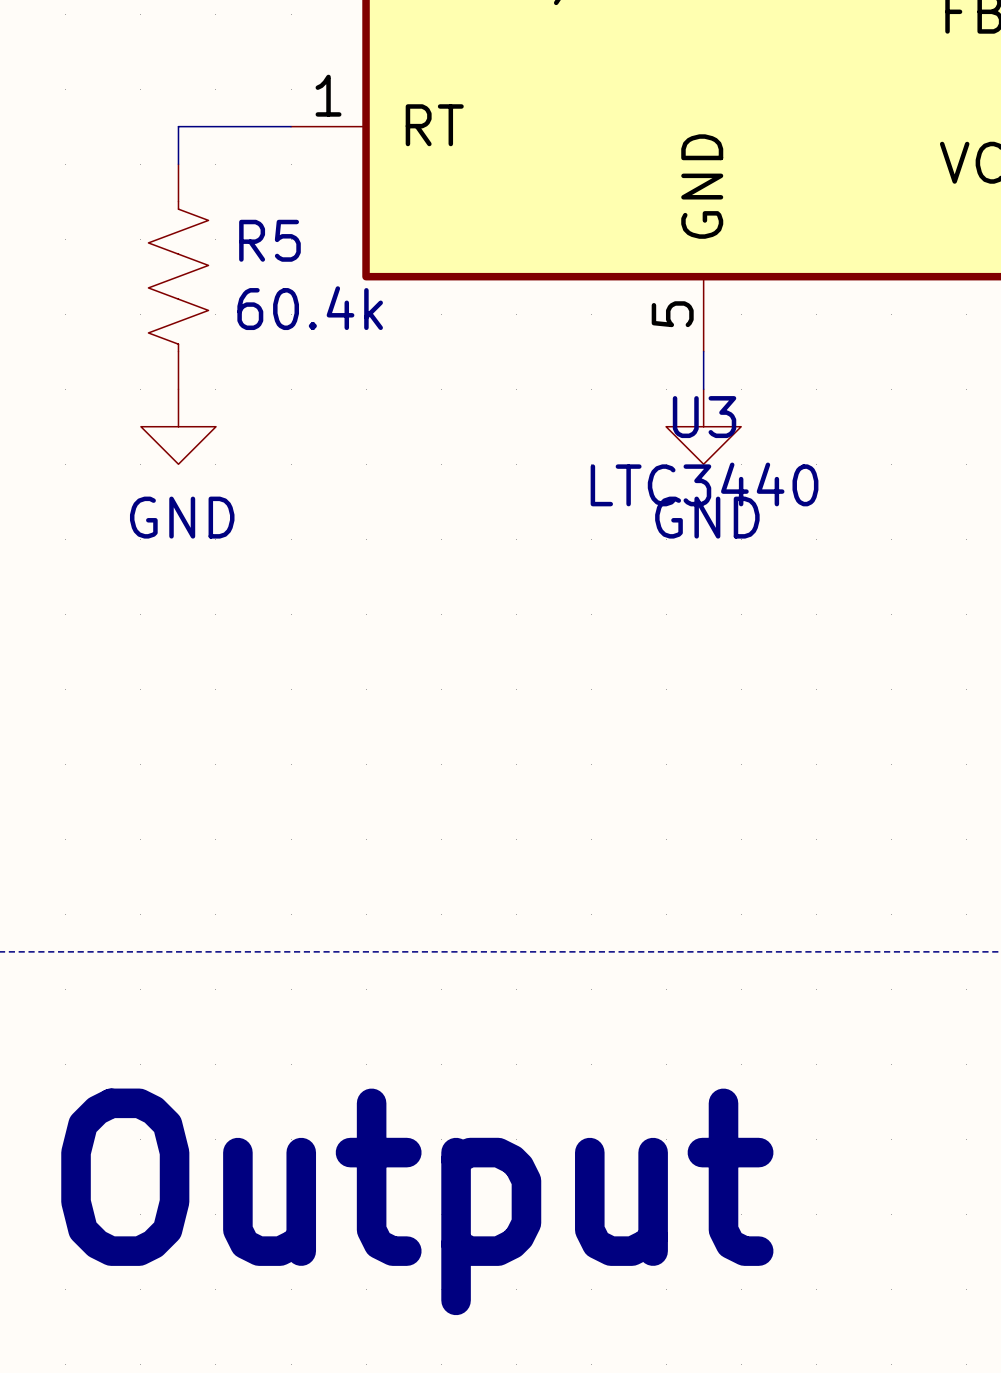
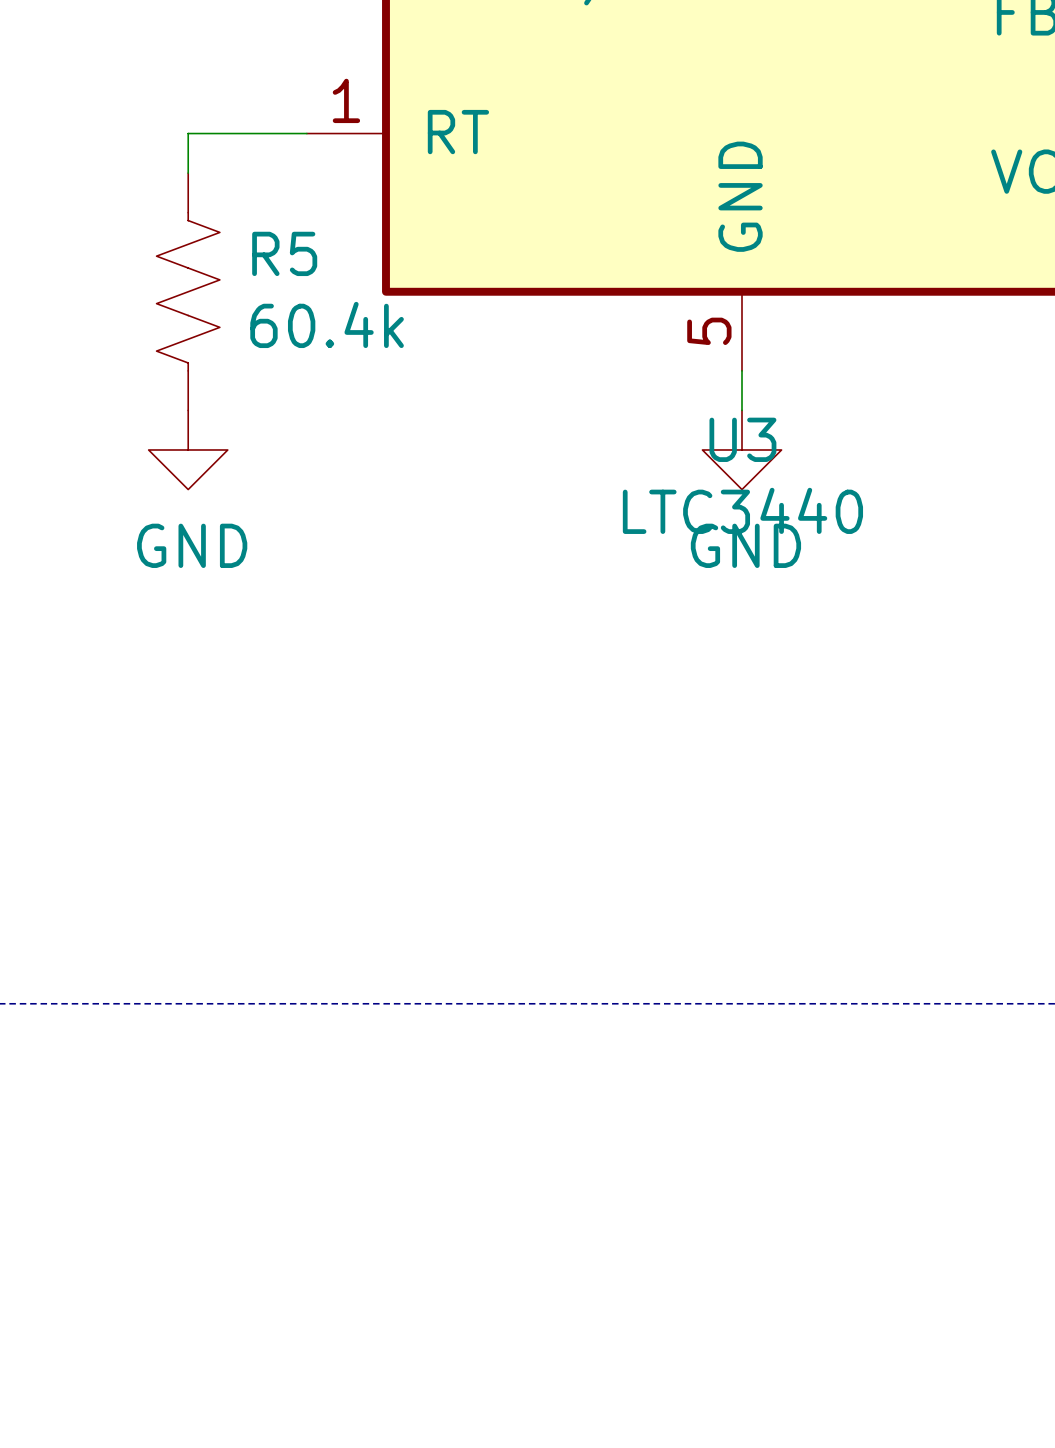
text: Output (417, 1201) -> none

